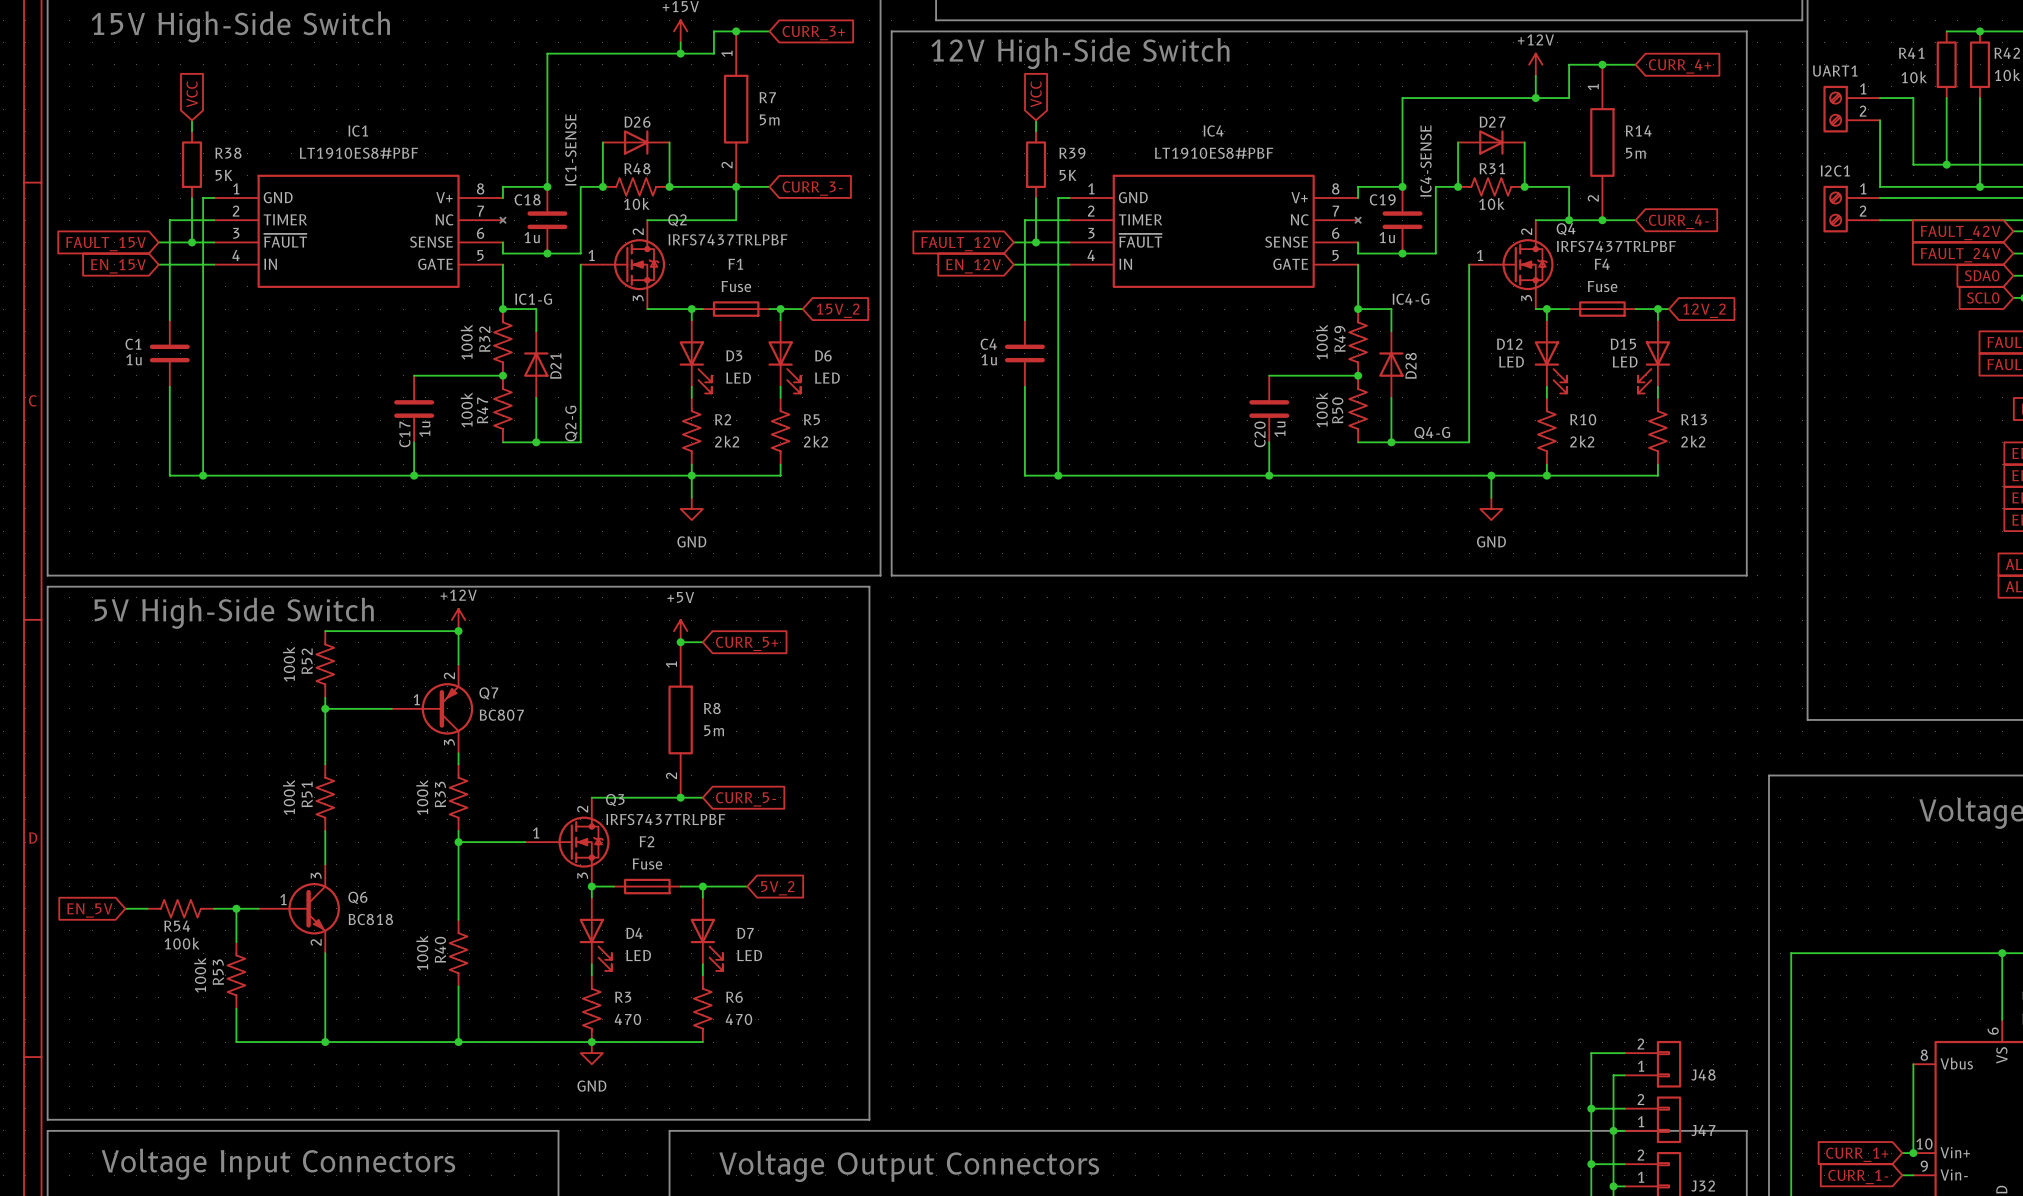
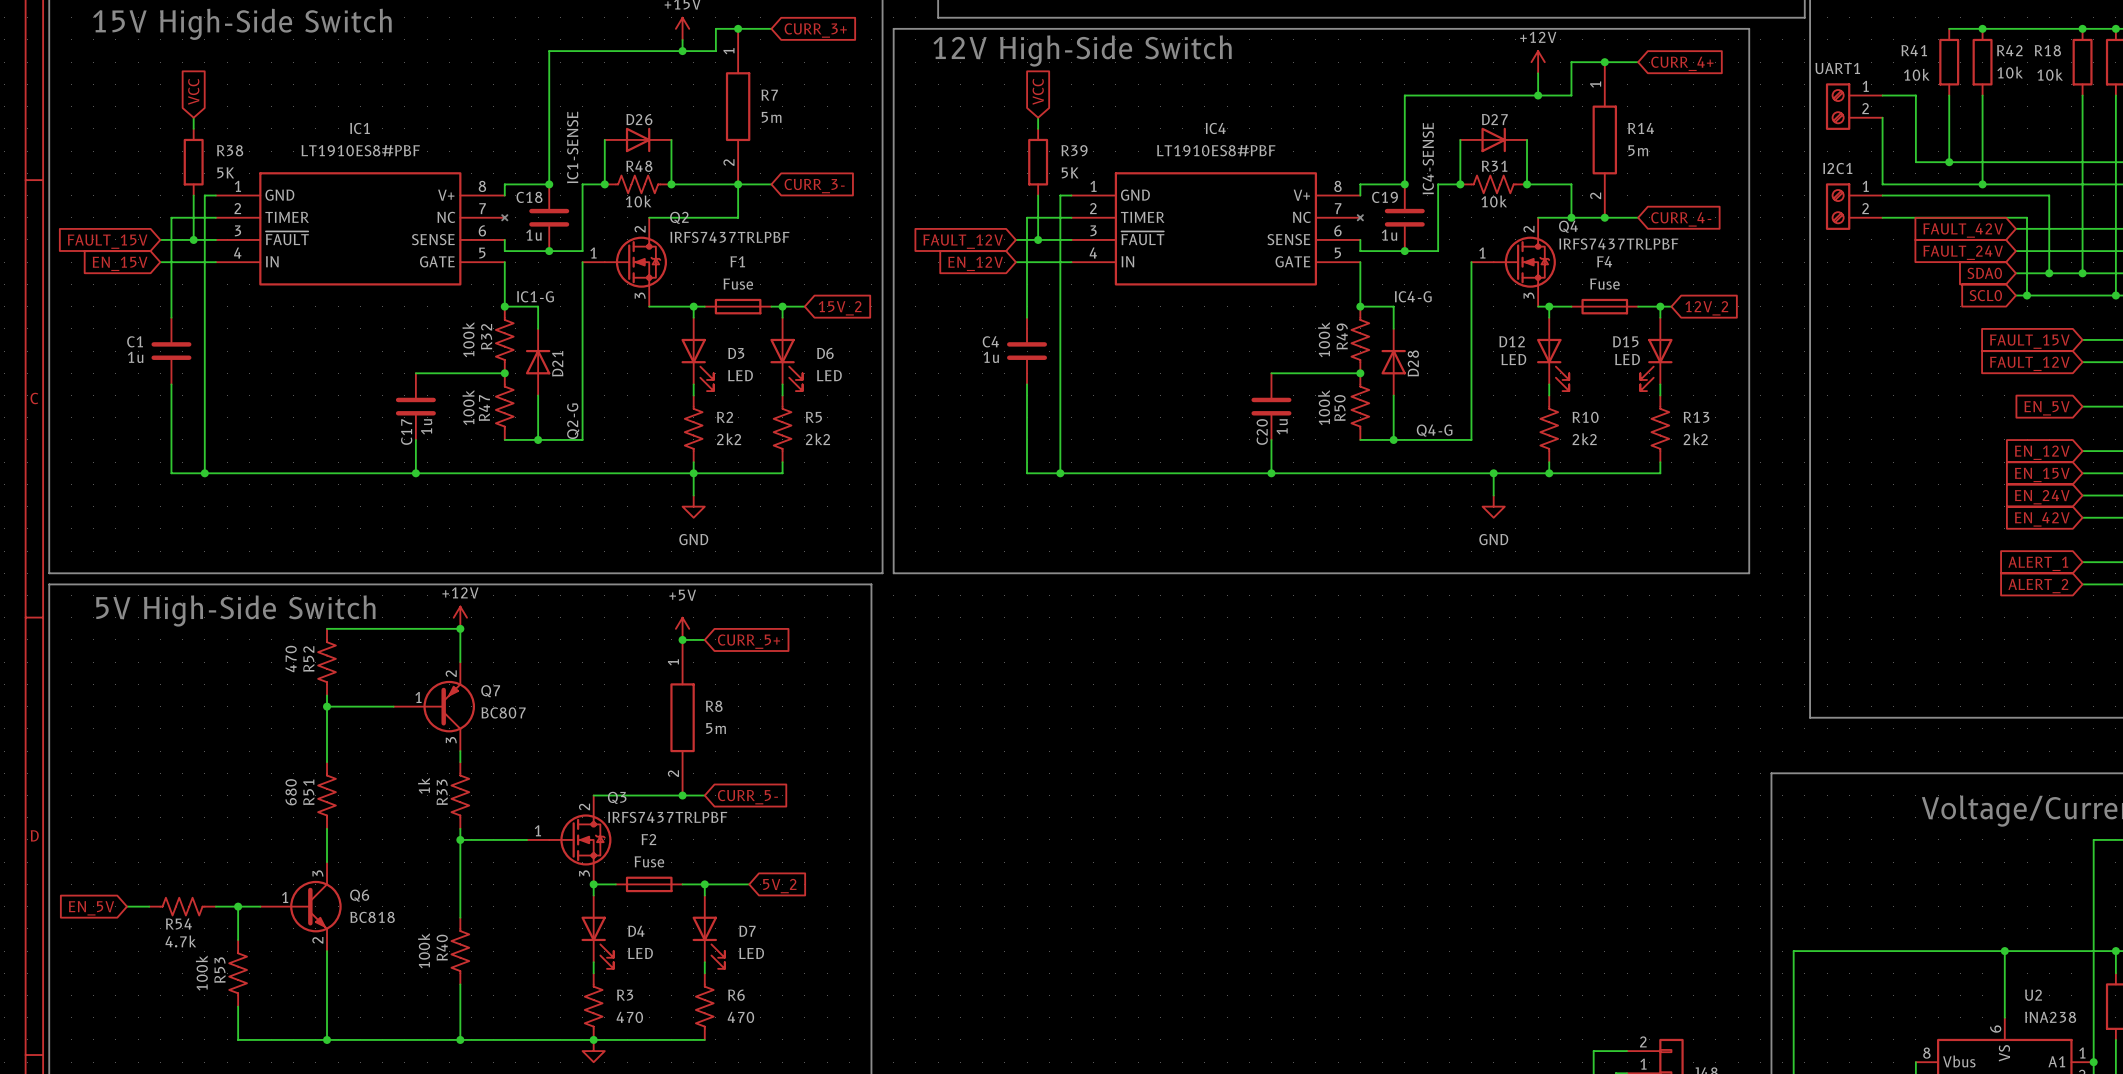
R52 value: 100k (289, 664) -> 470 (291, 658)
R51 value: 100k (289, 797) -> 680 (291, 792)
R33 value: 100k (422, 797) -> 1k (424, 785)
R54 value: 100k (182, 943) -> 4.7k (180, 941)

